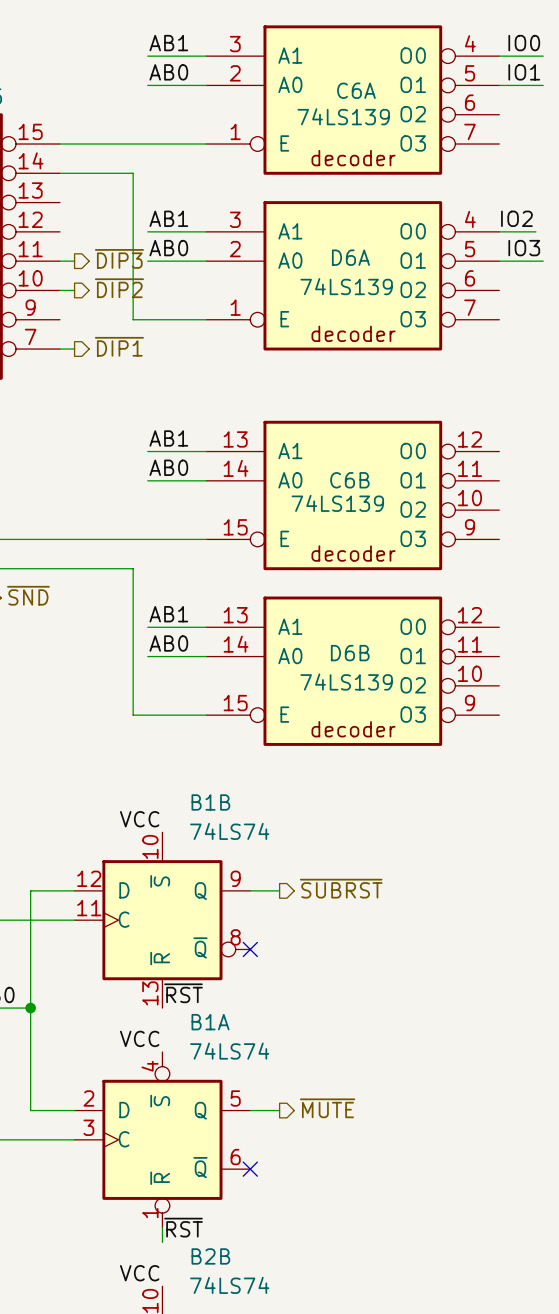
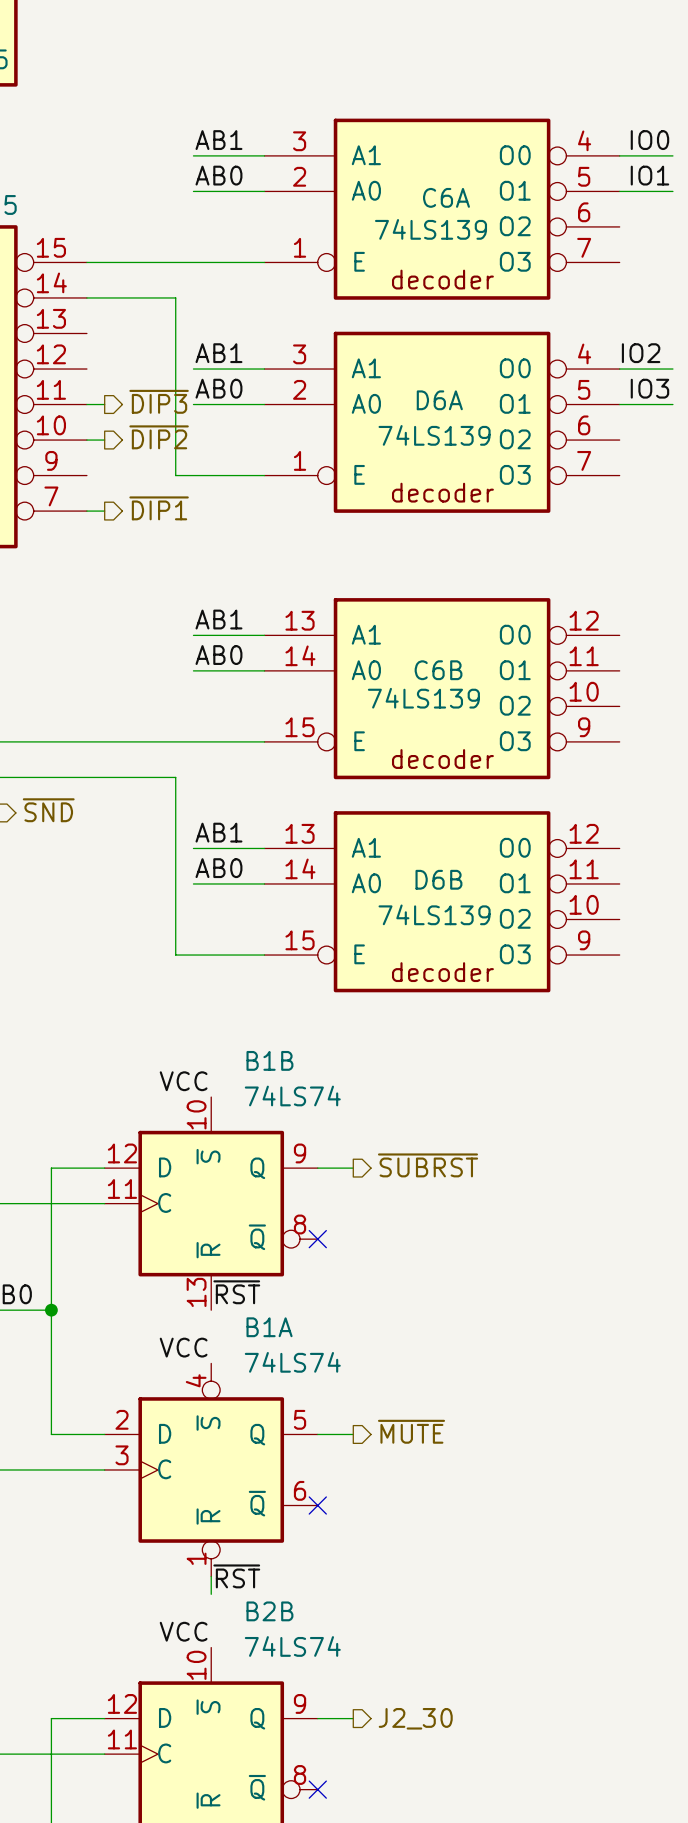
wire: none -> (664, 369) (672, 369)

